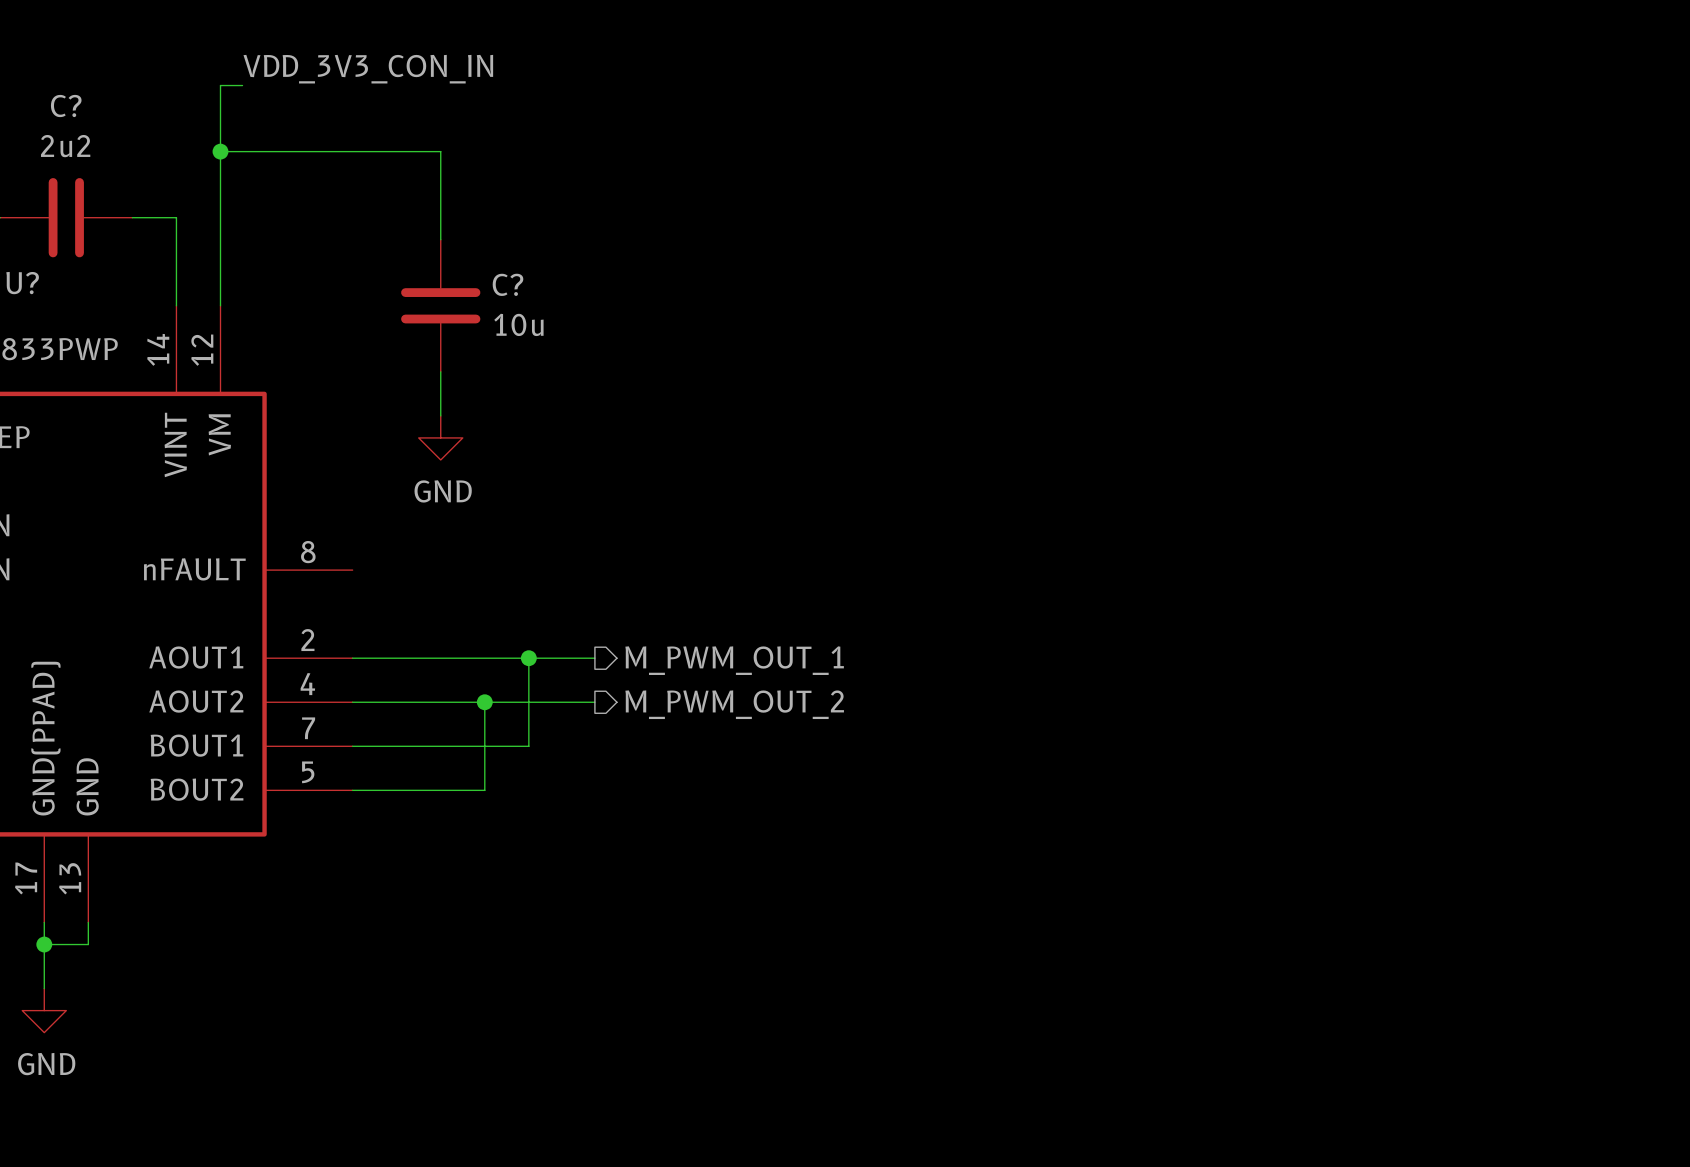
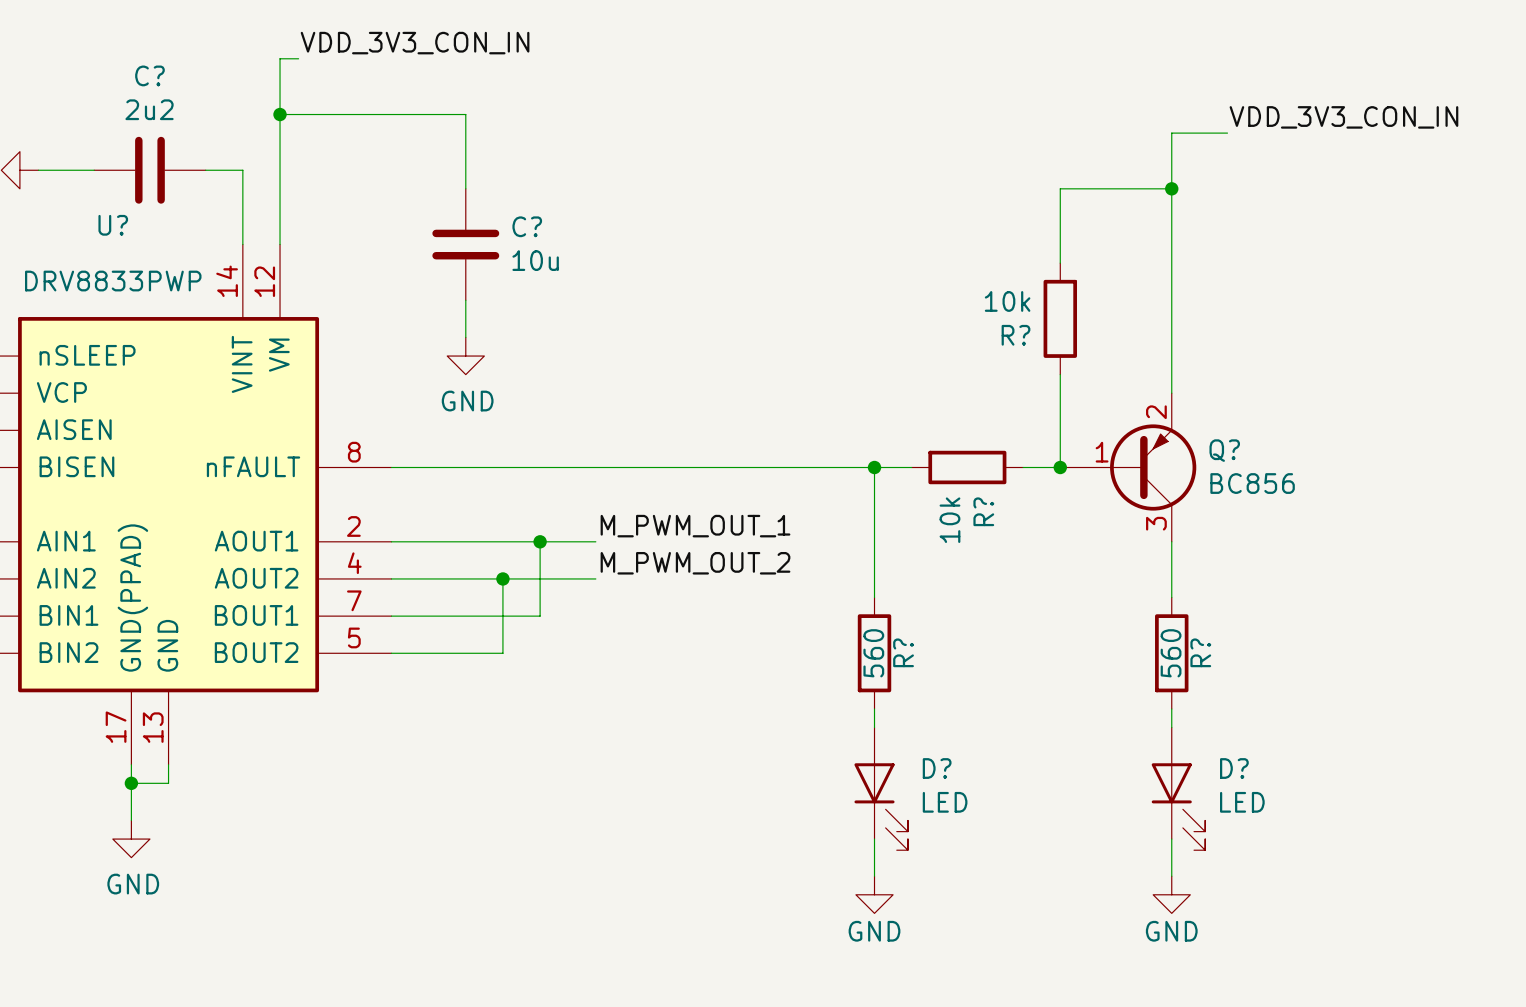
label: none -> VDD_3V3_CON_IN (1343, 117)
wire: none -> (1227, 133) (1171, 133) (1171, 393)
wire: none -> (1171, 188) (1060, 188) (1060, 263)
junction: none -> (1171, 188)
R?: none -> 10k (1060, 318)
wire: none -> (1060, 374) (1060, 467) (1023, 467)
wire: none -> (391, 467) (911, 467)
wire: none -> (874, 467) (874, 597)
junction: none -> (874, 467)
R?: none -> 10k (967, 467)
junction: none -> (1060, 467)
Q?: none -> BC856 (1128, 467)
label: none -> M_PWM_OUT_1 (695, 526)
wire: none -> (1171, 541) (1171, 597)
hierarchical label: M_PWM_OUT_1 (734, 660) -> none
label: none -> M_PWM_OUT_2 (695, 563)
hierarchical label: M_PWM_OUT_2 (734, 704) -> none
R?: none -> 560 (874, 653)
R?: none -> 560 (1171, 653)
wire: none -> (874, 709) (874, 727)
wire: none -> (1171, 709) (1171, 727)
D?: none -> LED (881, 788)
D?: none -> LED (1178, 788)
wire: none -> (874, 839) (874, 876)
wire: none -> (1171, 839) (1171, 876)
power symbol: none -> GND (874, 894)
power symbol: none -> GND (1171, 894)

